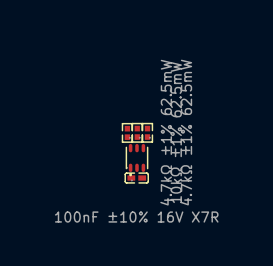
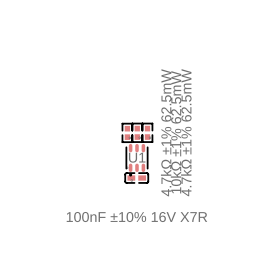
U1 name: none -> U1 (137, 157)

